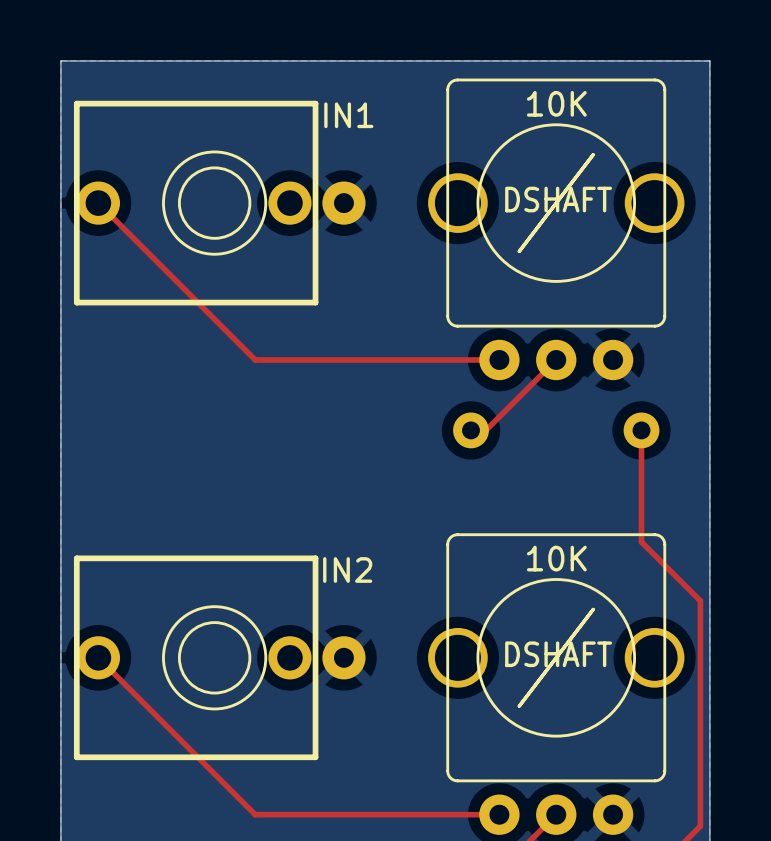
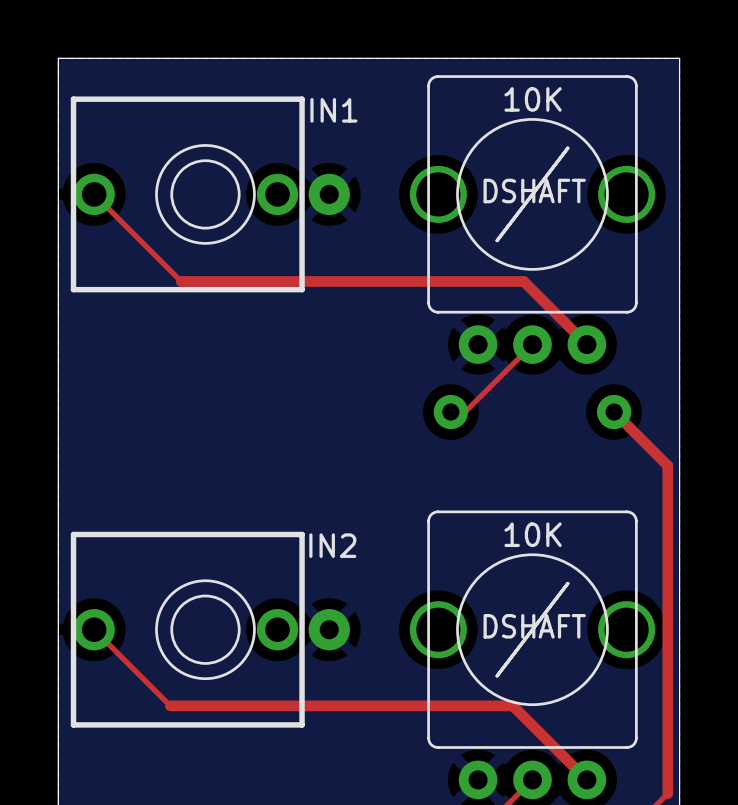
top track: (189, 294) (255, 359) (499, 359) -> (181, 281) (523, 281) (586, 344)
top track: (641, 430) (641, 542) (700, 600) (700, 826) (697, 829) -> (614, 412) (667, 465) (667, 793)
top track: (177, 737) (255, 814) (499, 814) -> (170, 705) (512, 705) (586, 779)

